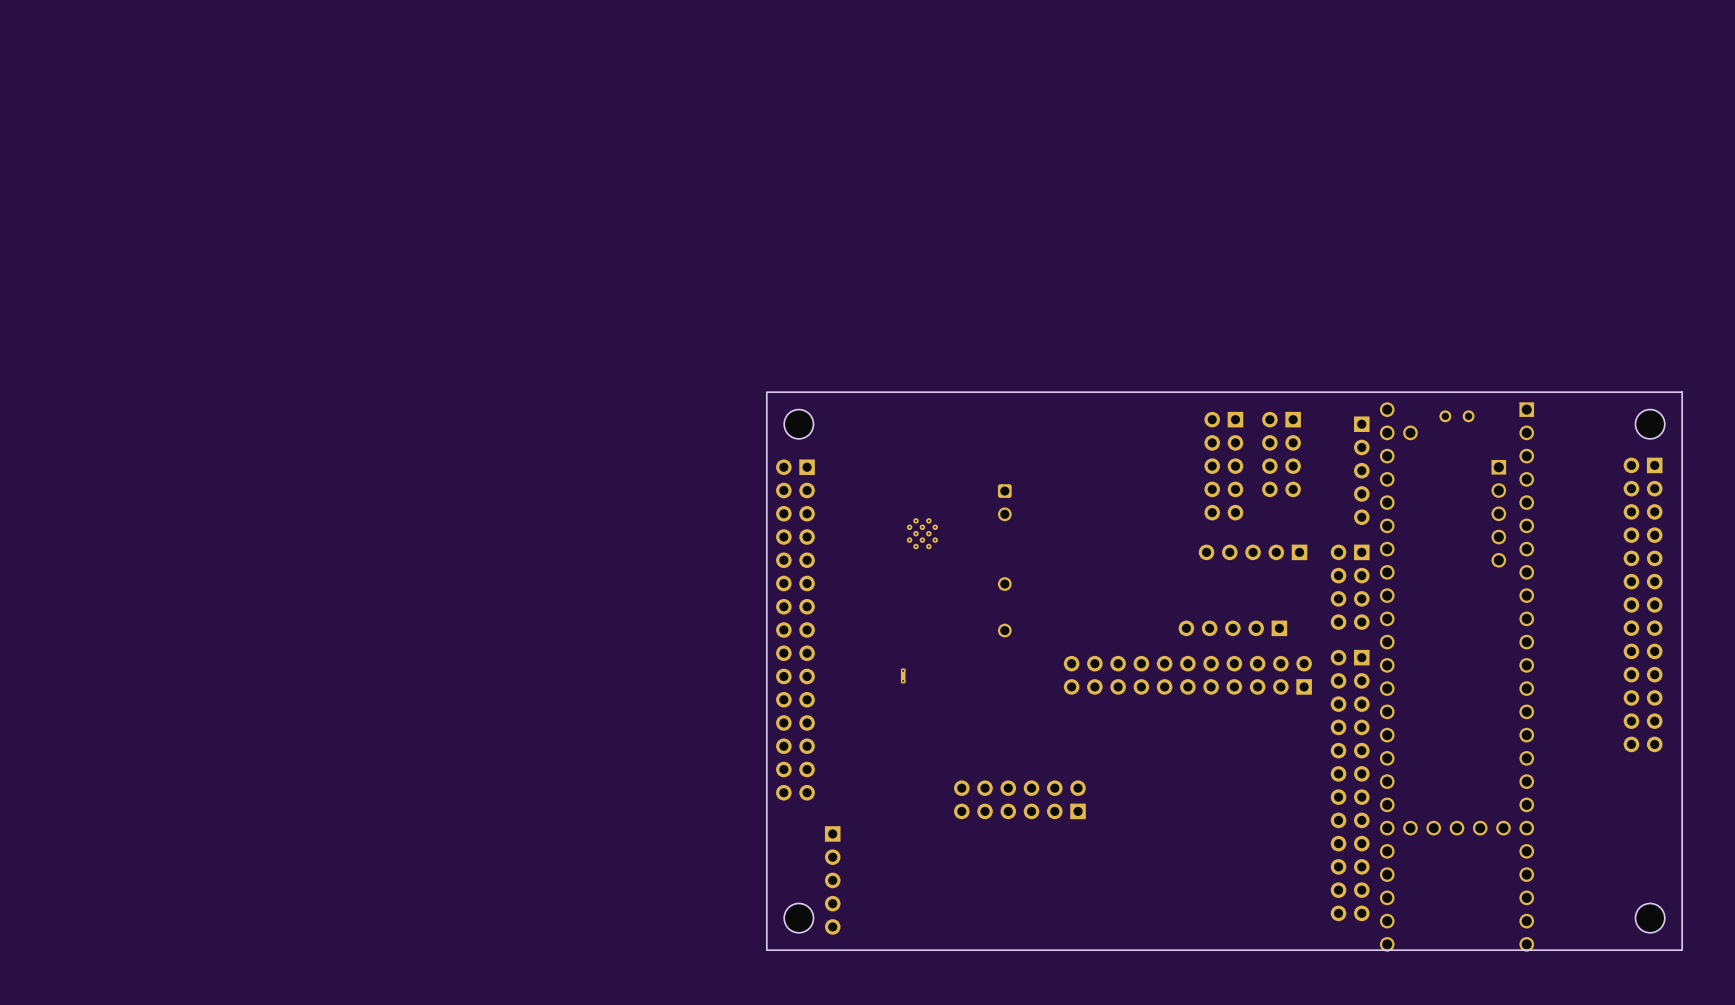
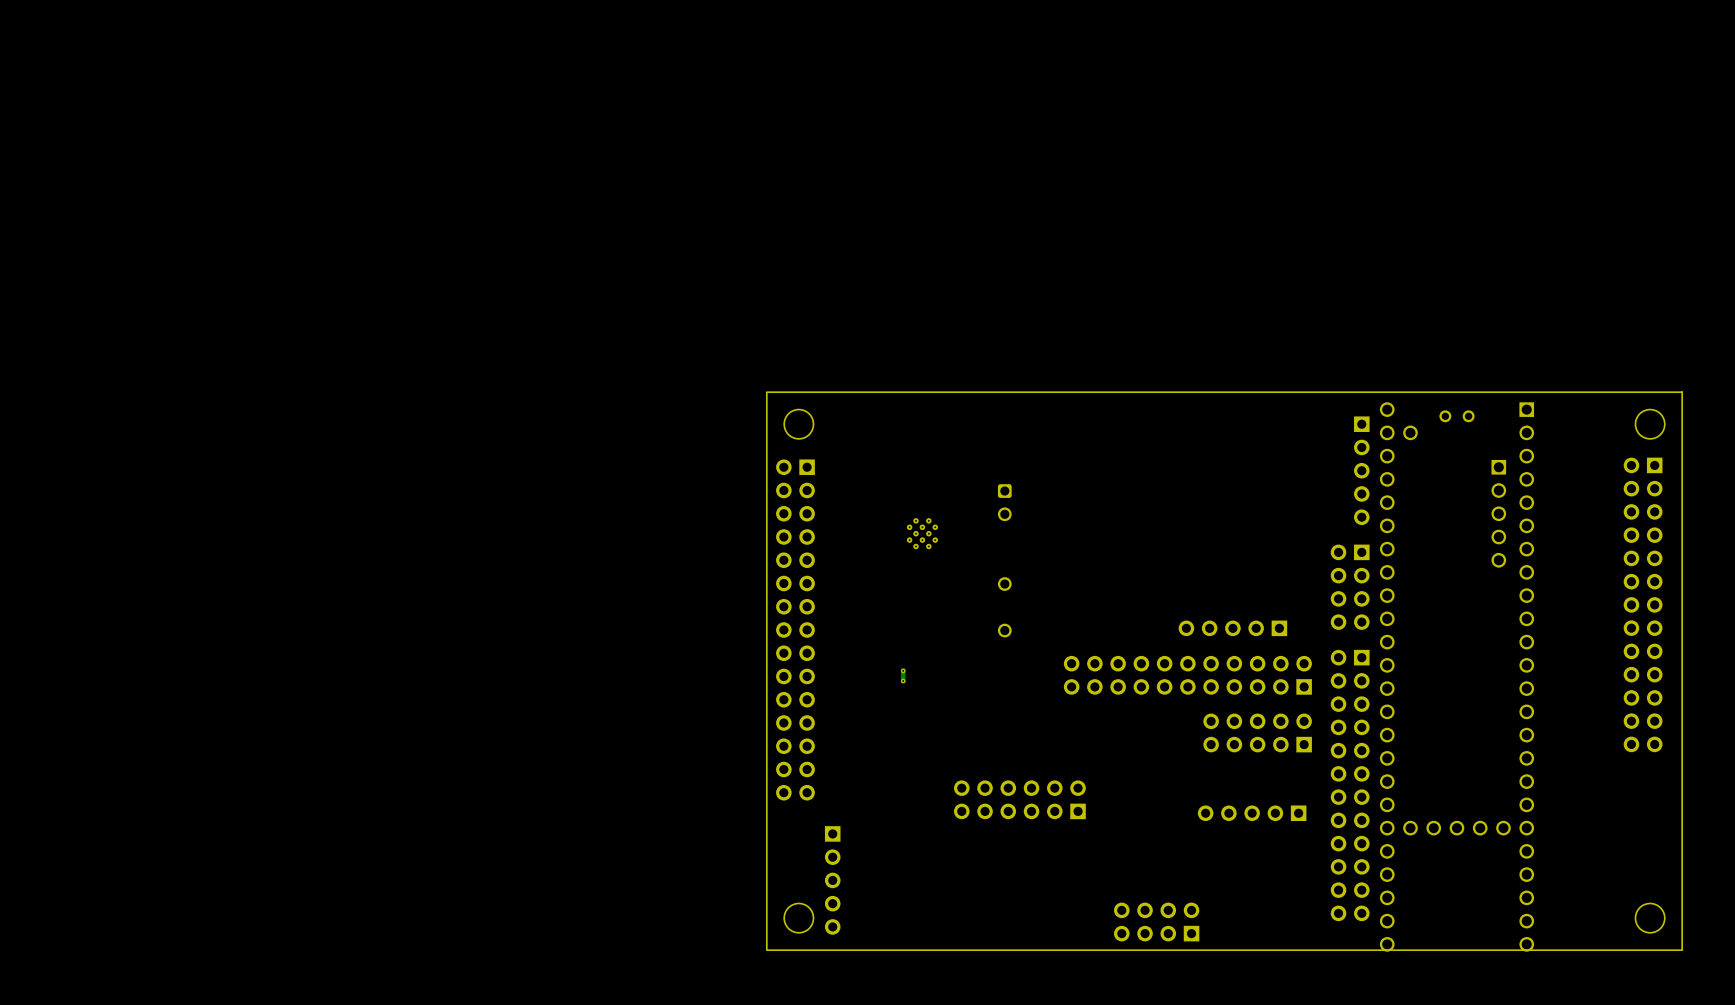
part: (1281, 454) -> none
part: (1223, 466) -> none
part: (1253, 552) -> none
part: none -> (1257, 732)
part: none -> (1252, 813)
part: none -> (1156, 921)

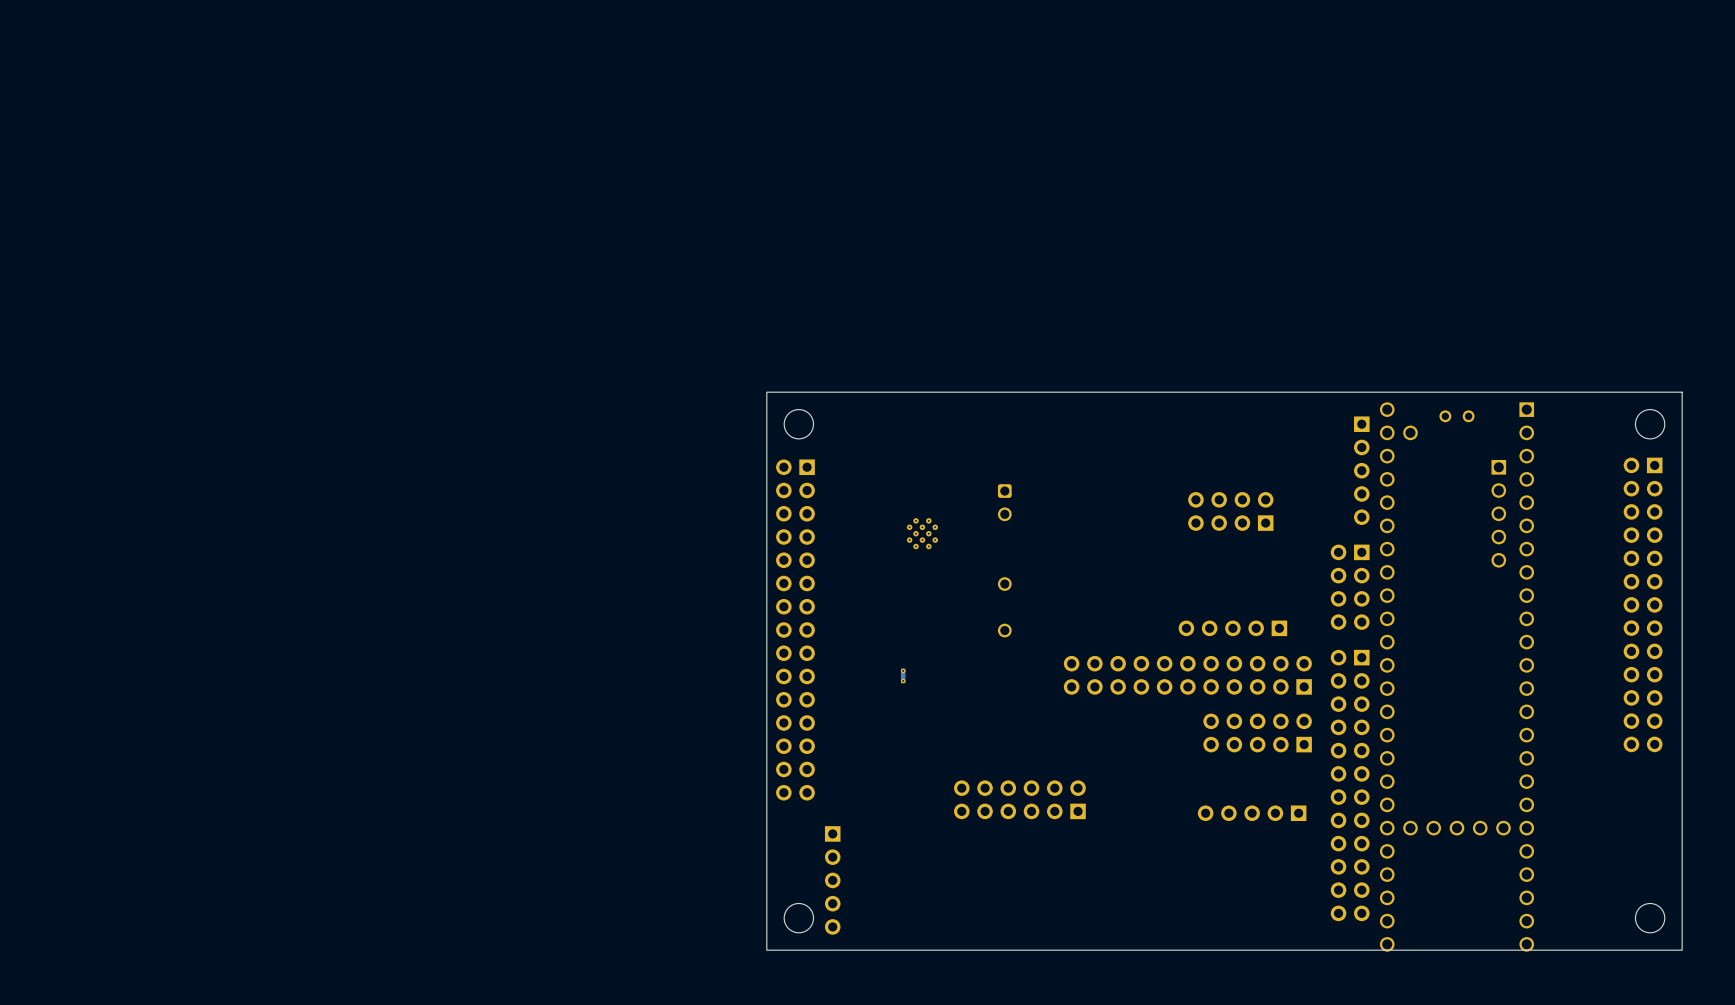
part: none -> (1230, 511)
part: (1156, 921) -> none

